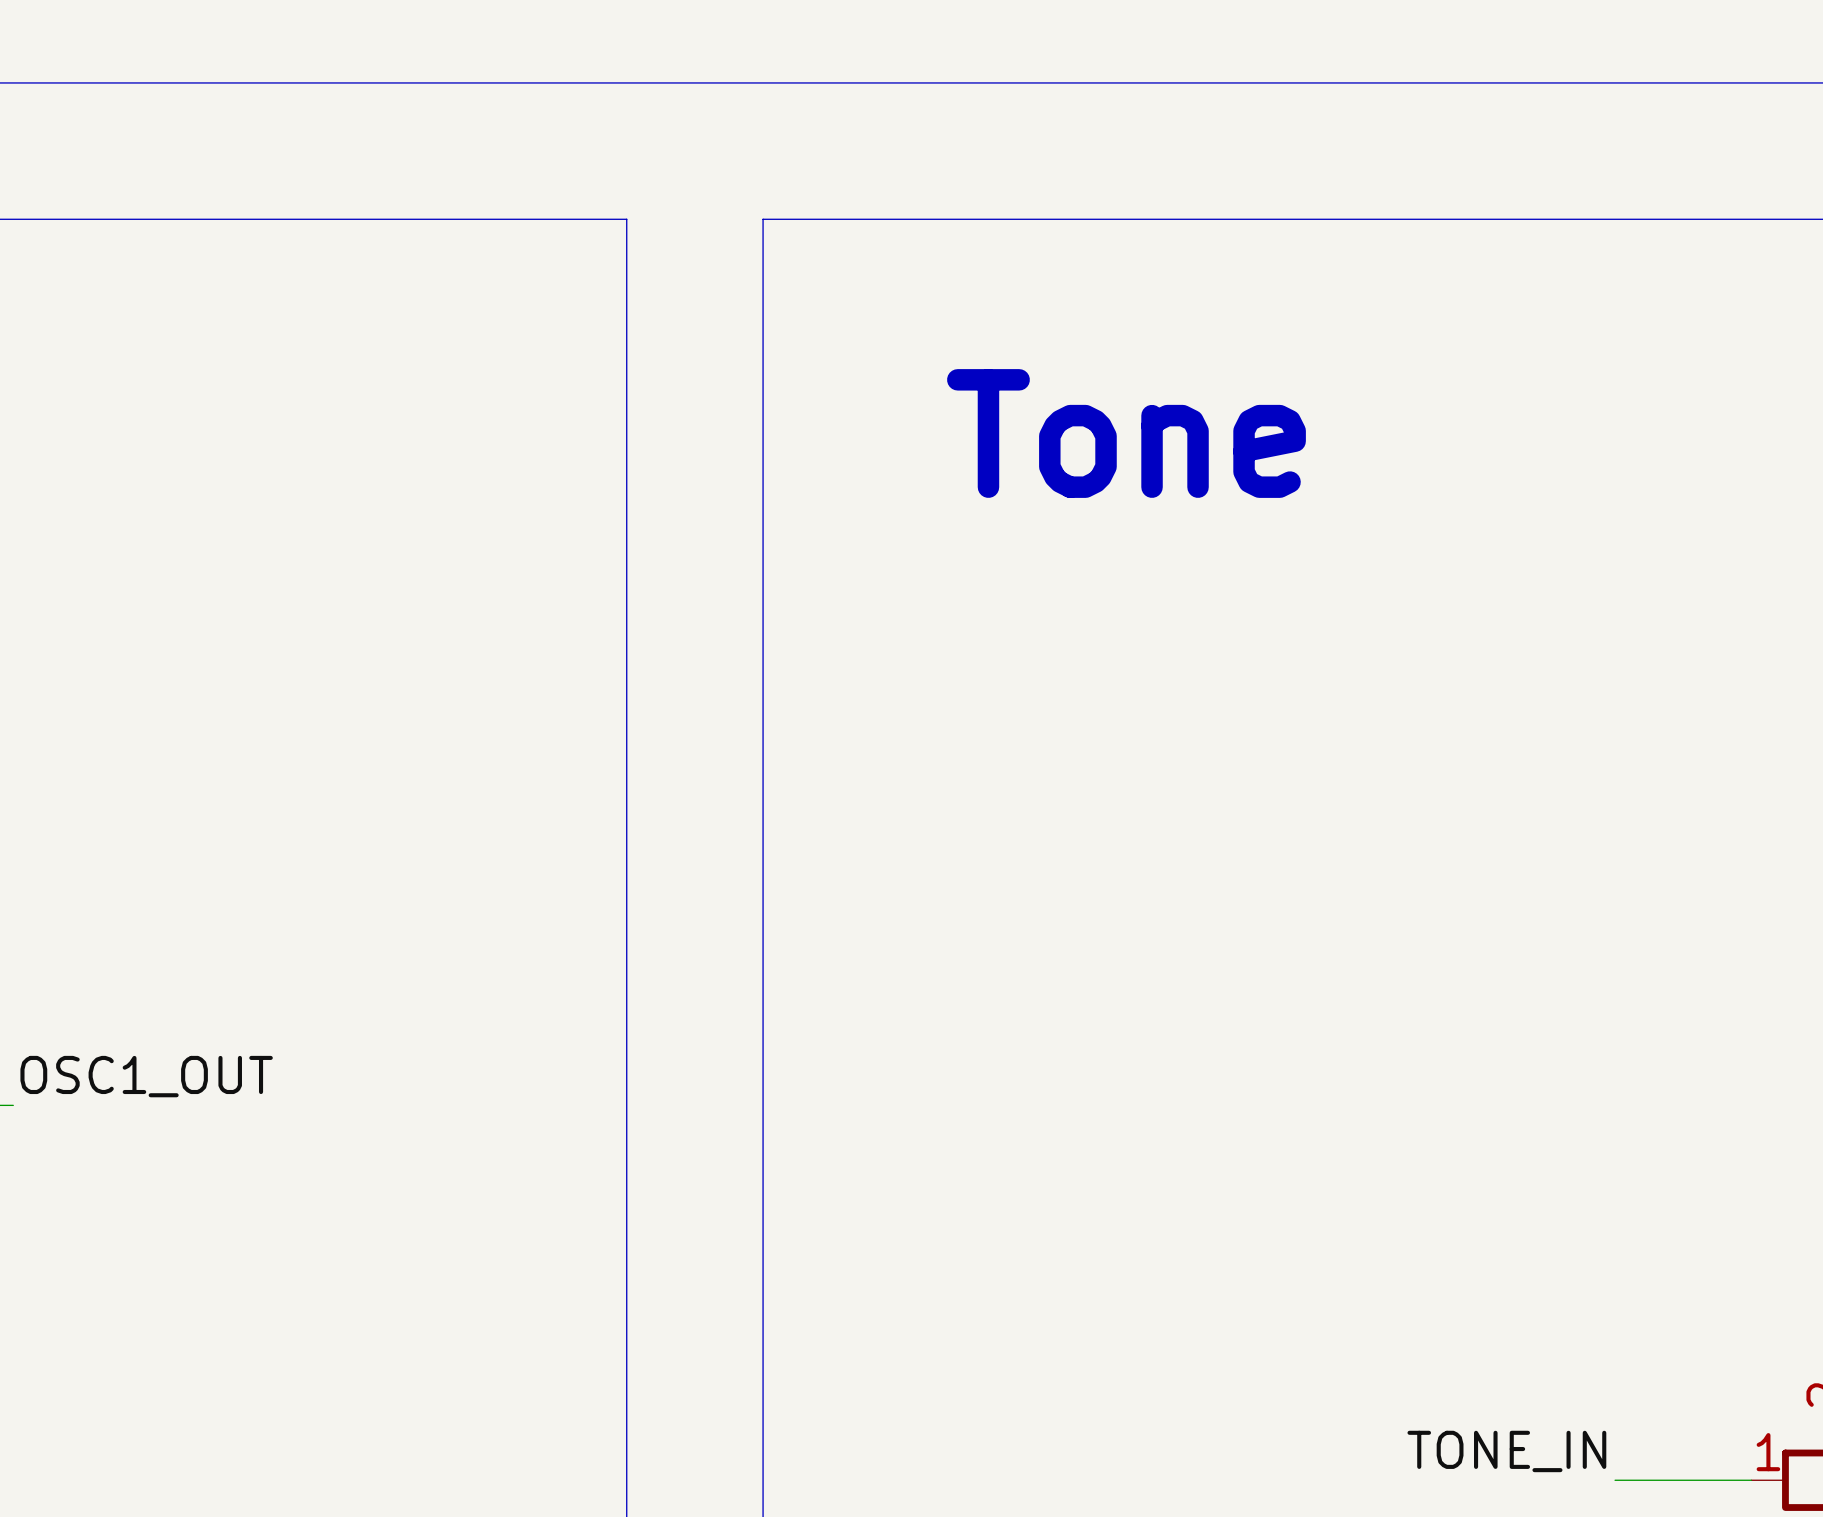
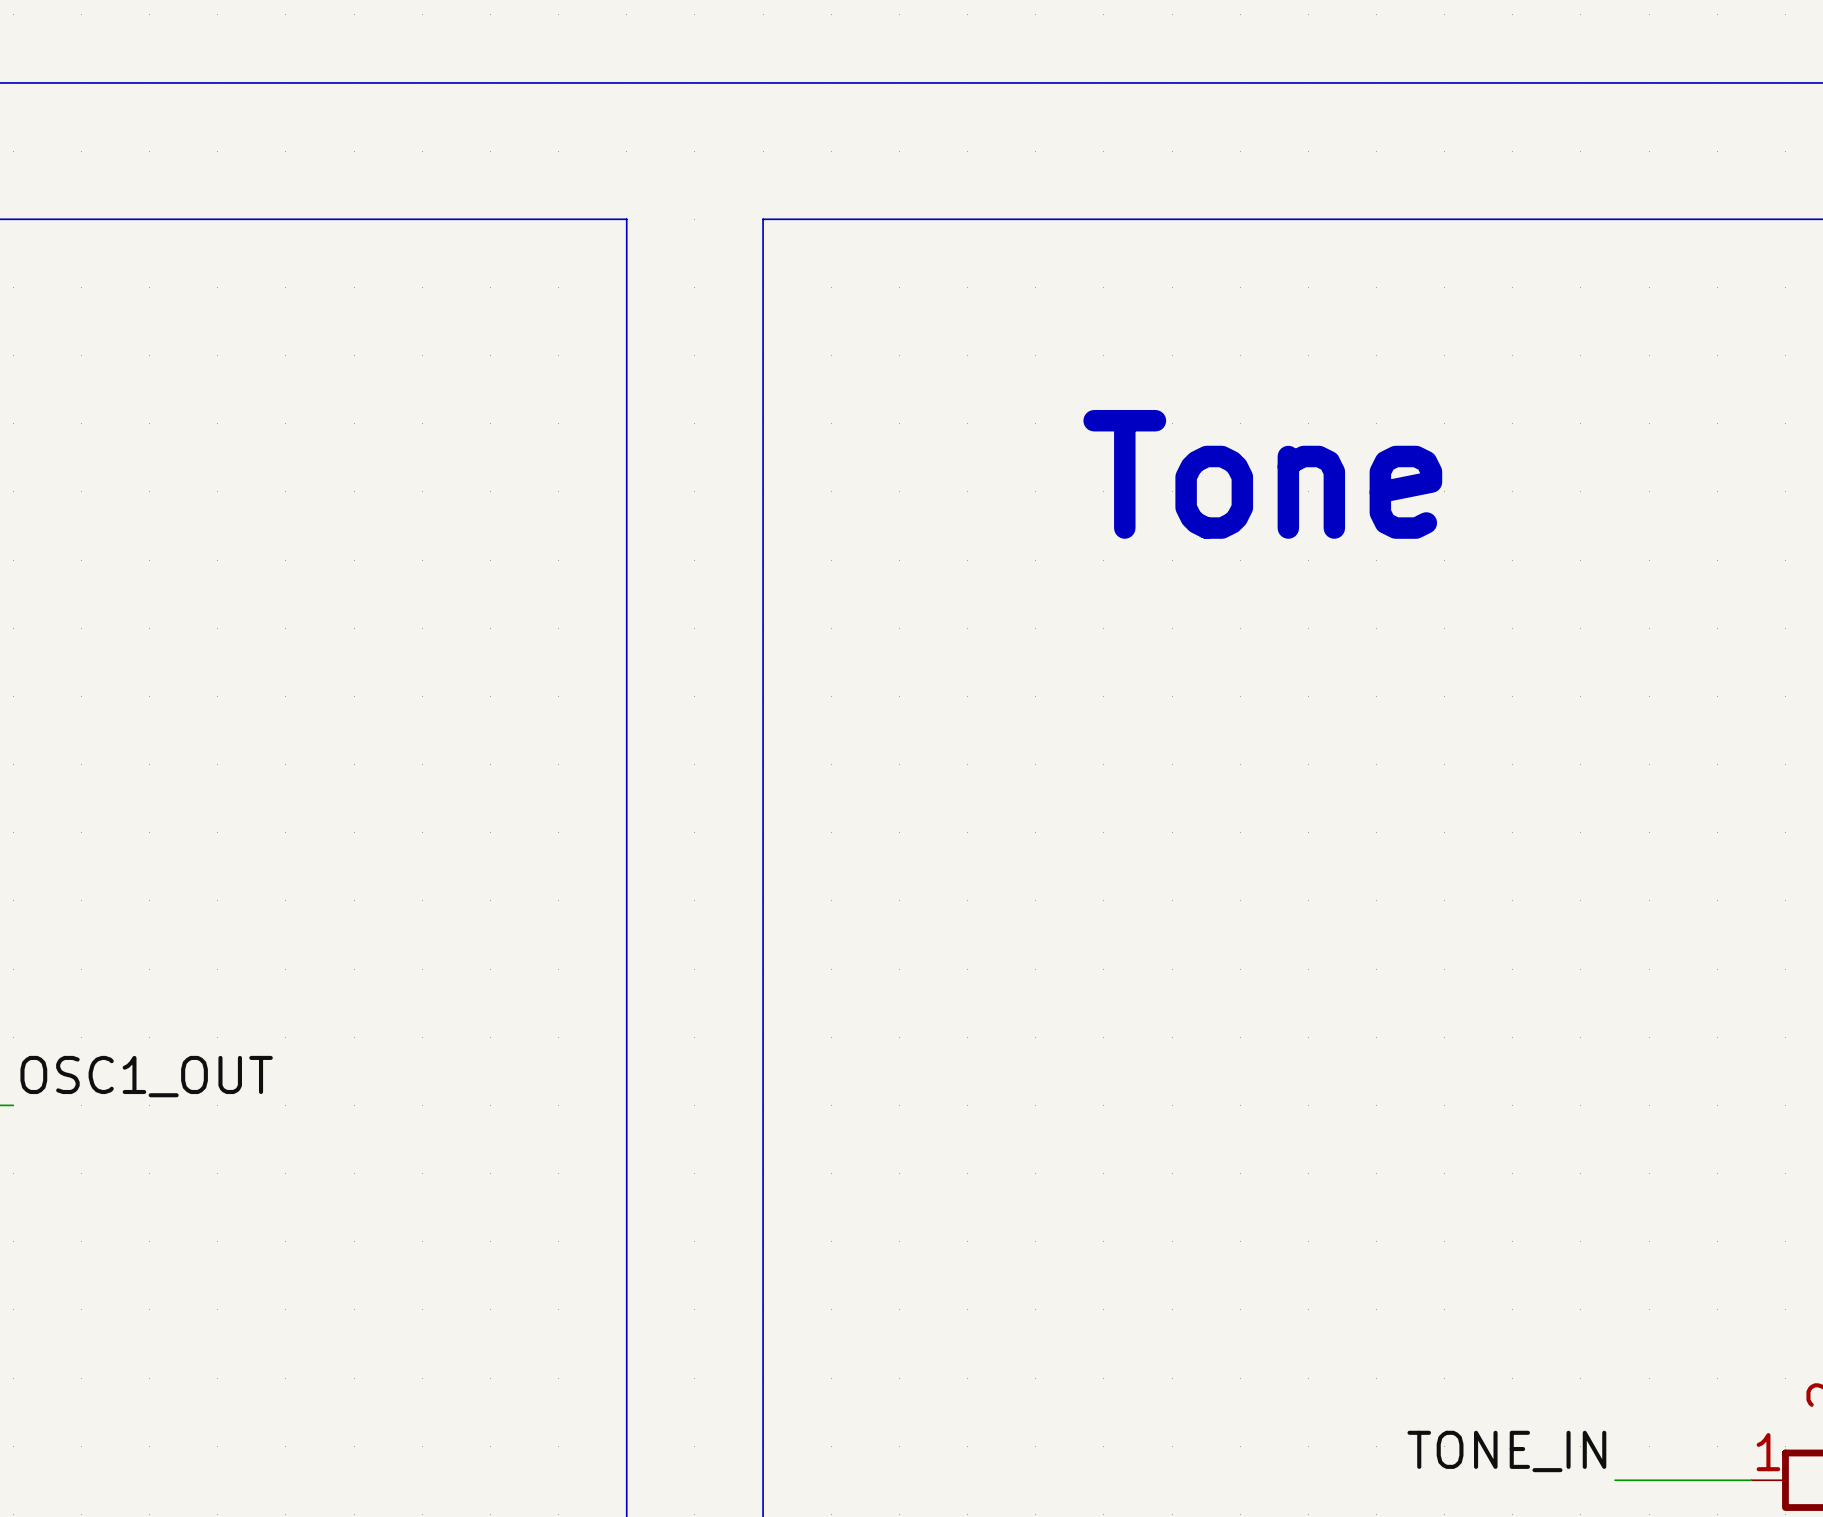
text position: Tone (1126, 433) -> Tone (1262, 474)

